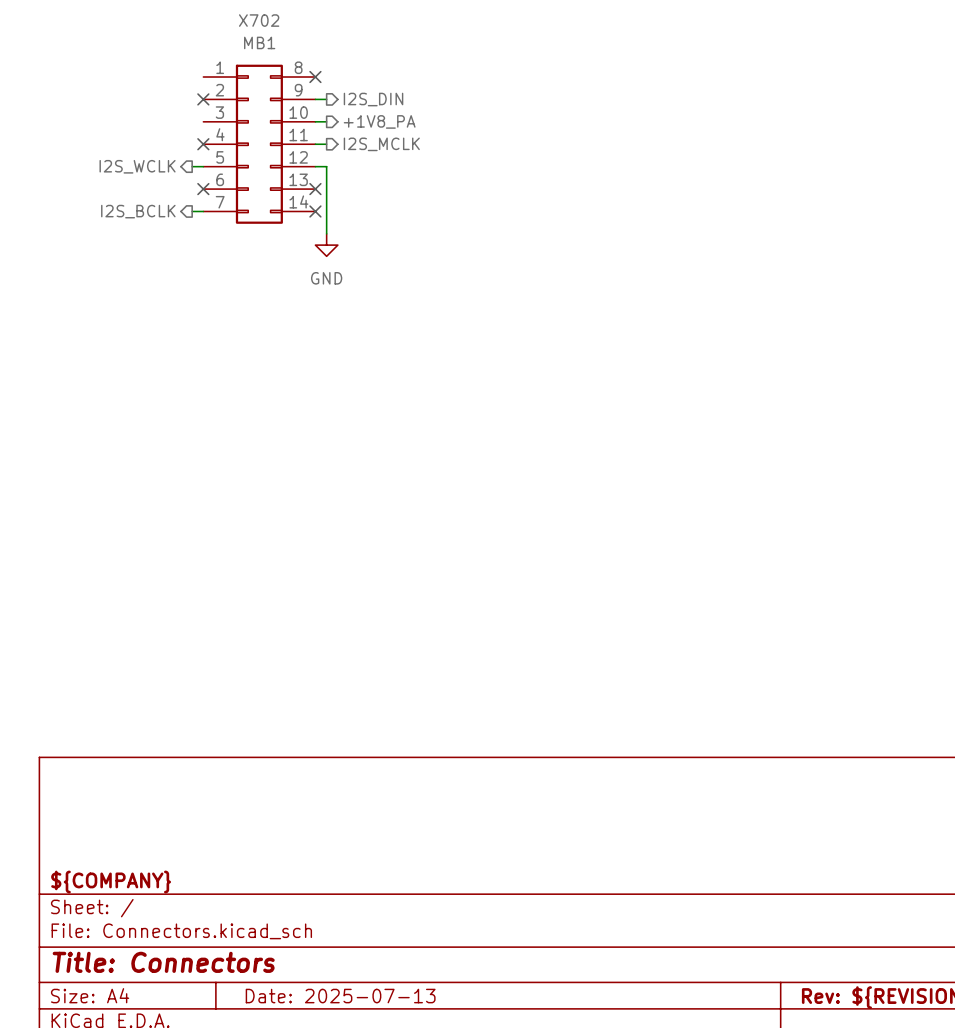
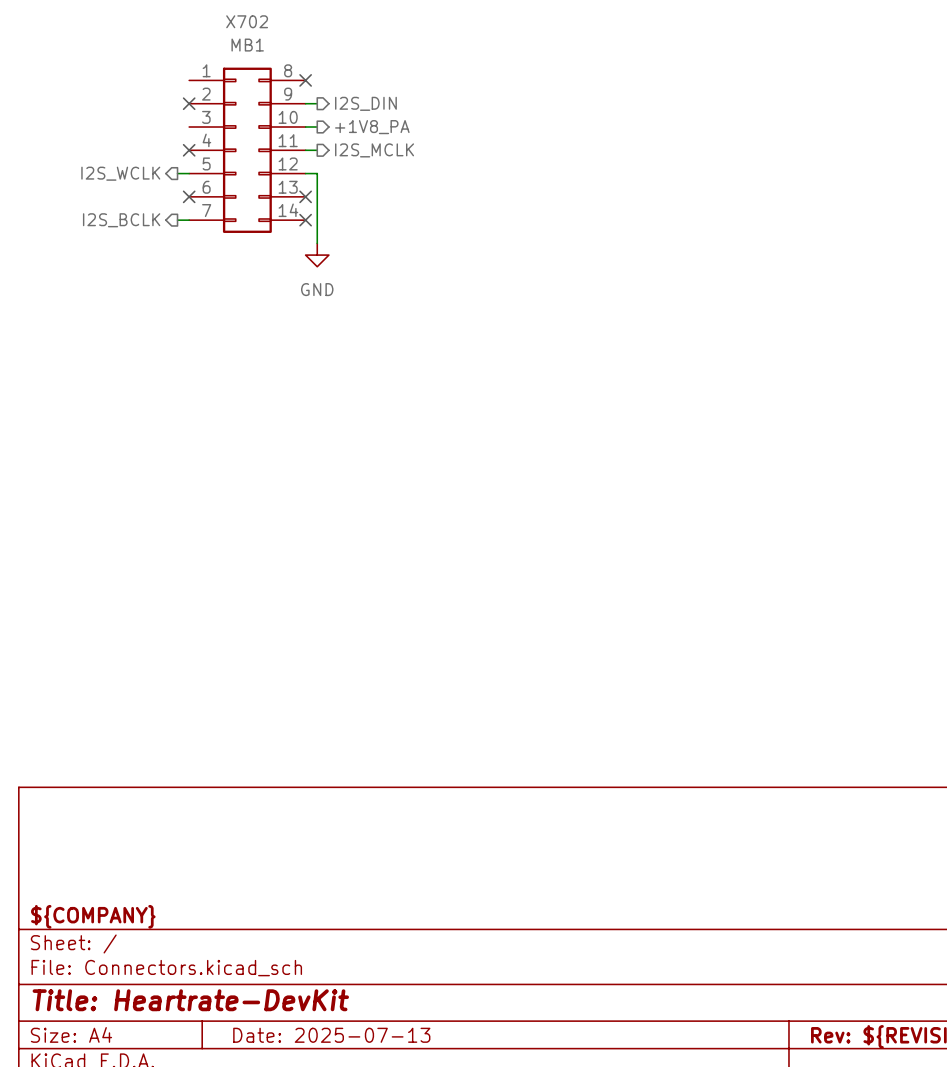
title block: Title: Connectors (163, 962) -> Title: Heartrate-DevKit (190, 1000)

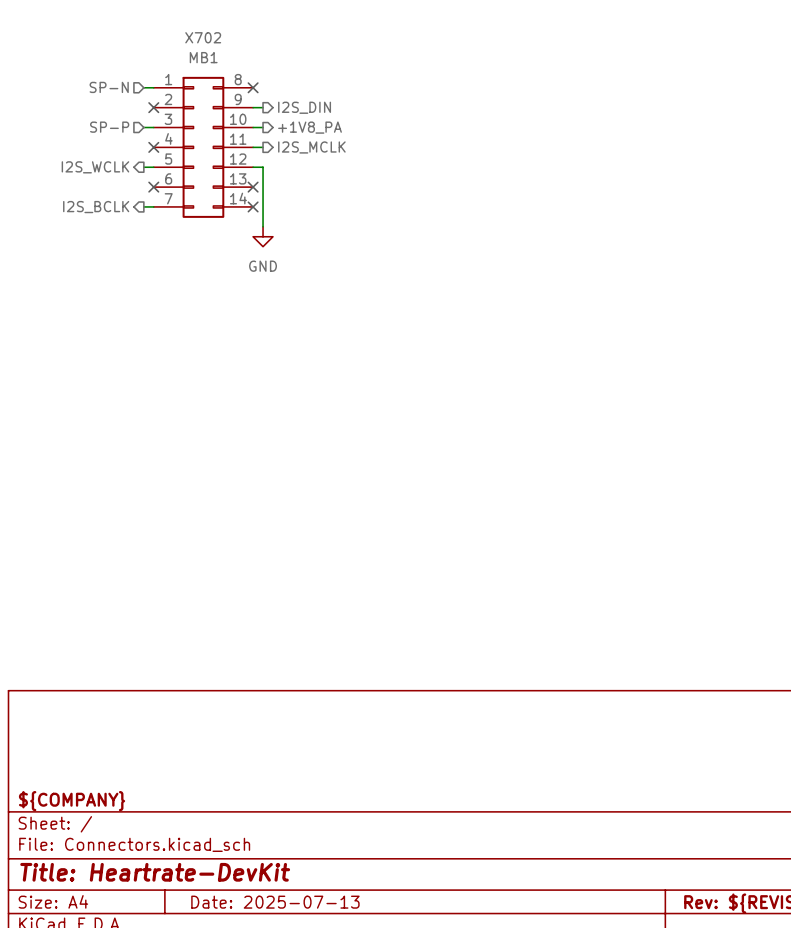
hierarchical label: none -> SP-N (109, 87)
wire: none -> (143, 87) (153, 87)
hierarchical label: none -> SP-P (109, 127)
wire: none -> (143, 127) (153, 127)

